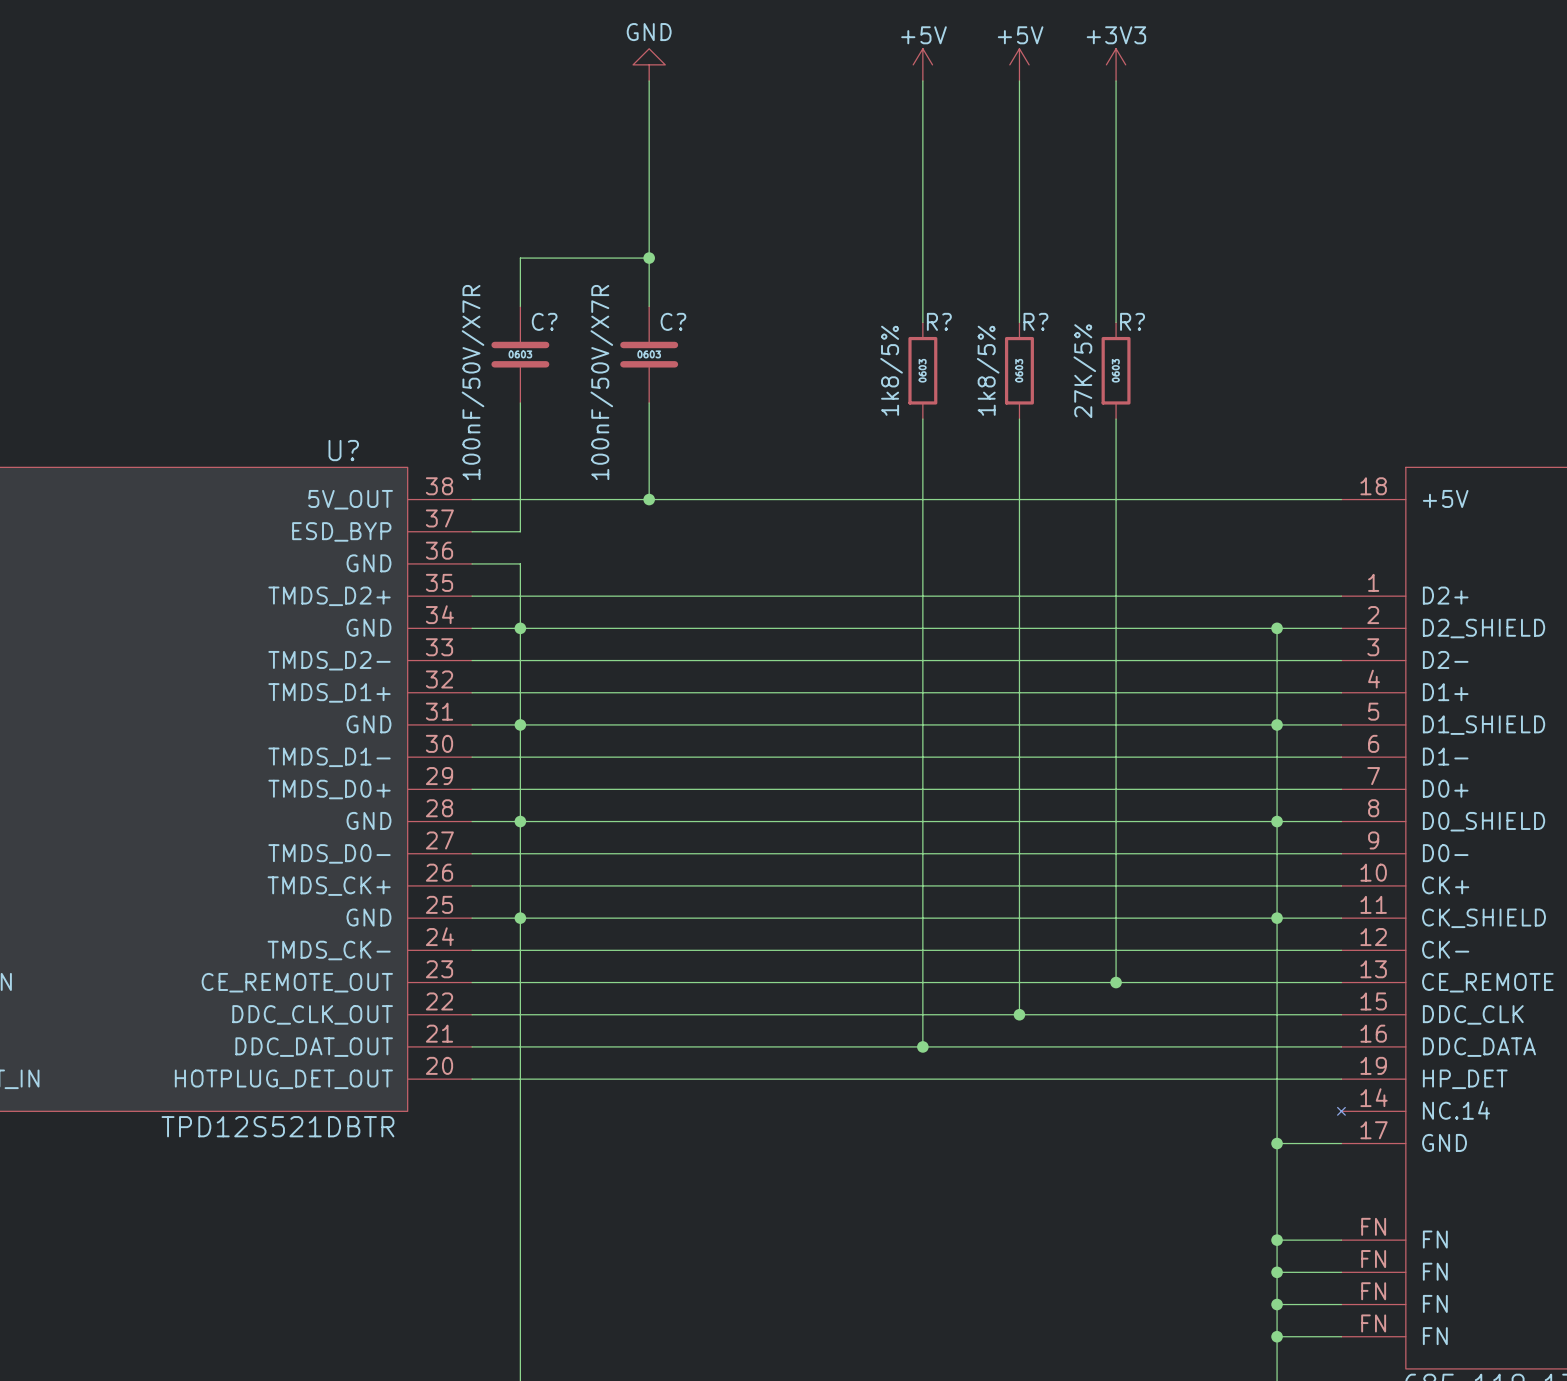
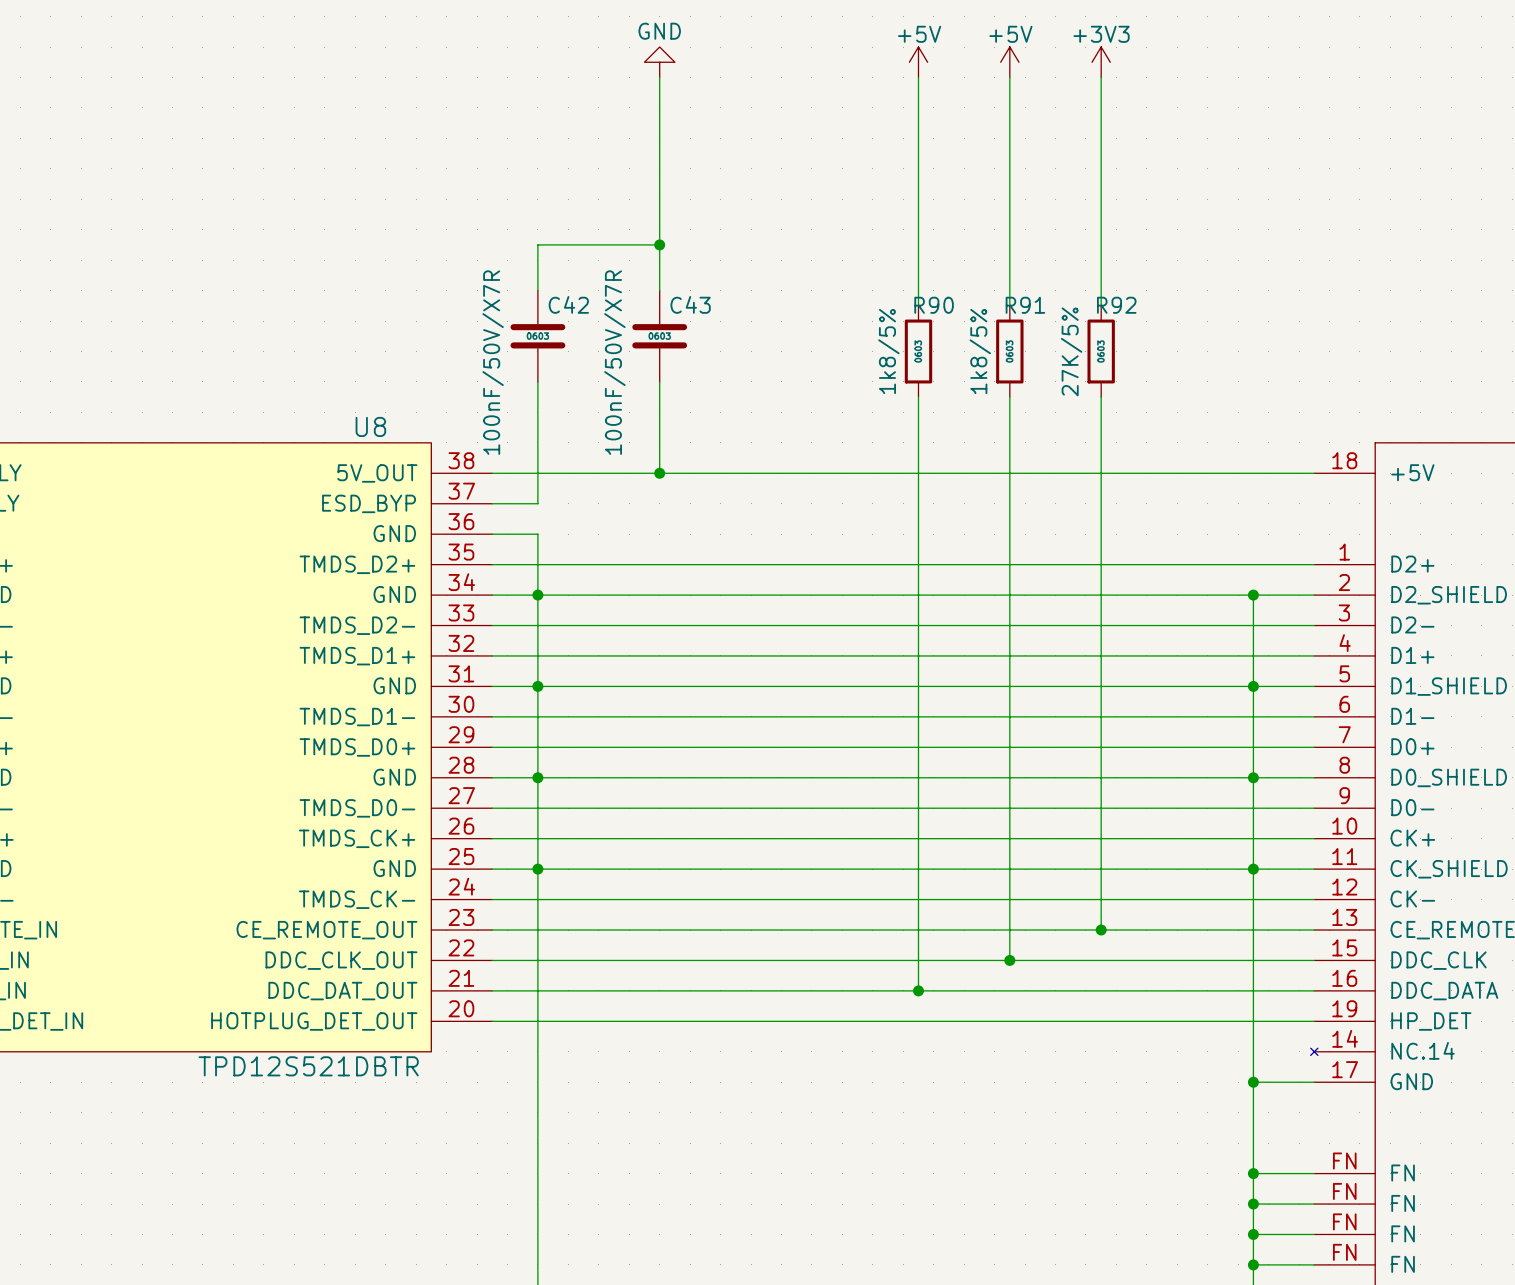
C? name: C? (544, 321) -> C42 (568, 304)
C? name: C? (673, 321) -> C43 (690, 304)
R? name: R? (939, 321) -> R90 (934, 305)
R? name: R? (1035, 321) -> R91 (1025, 305)
R? name: R? (1132, 321) -> R92 (1116, 305)
U? name: U? (343, 450) -> U8 (370, 426)

